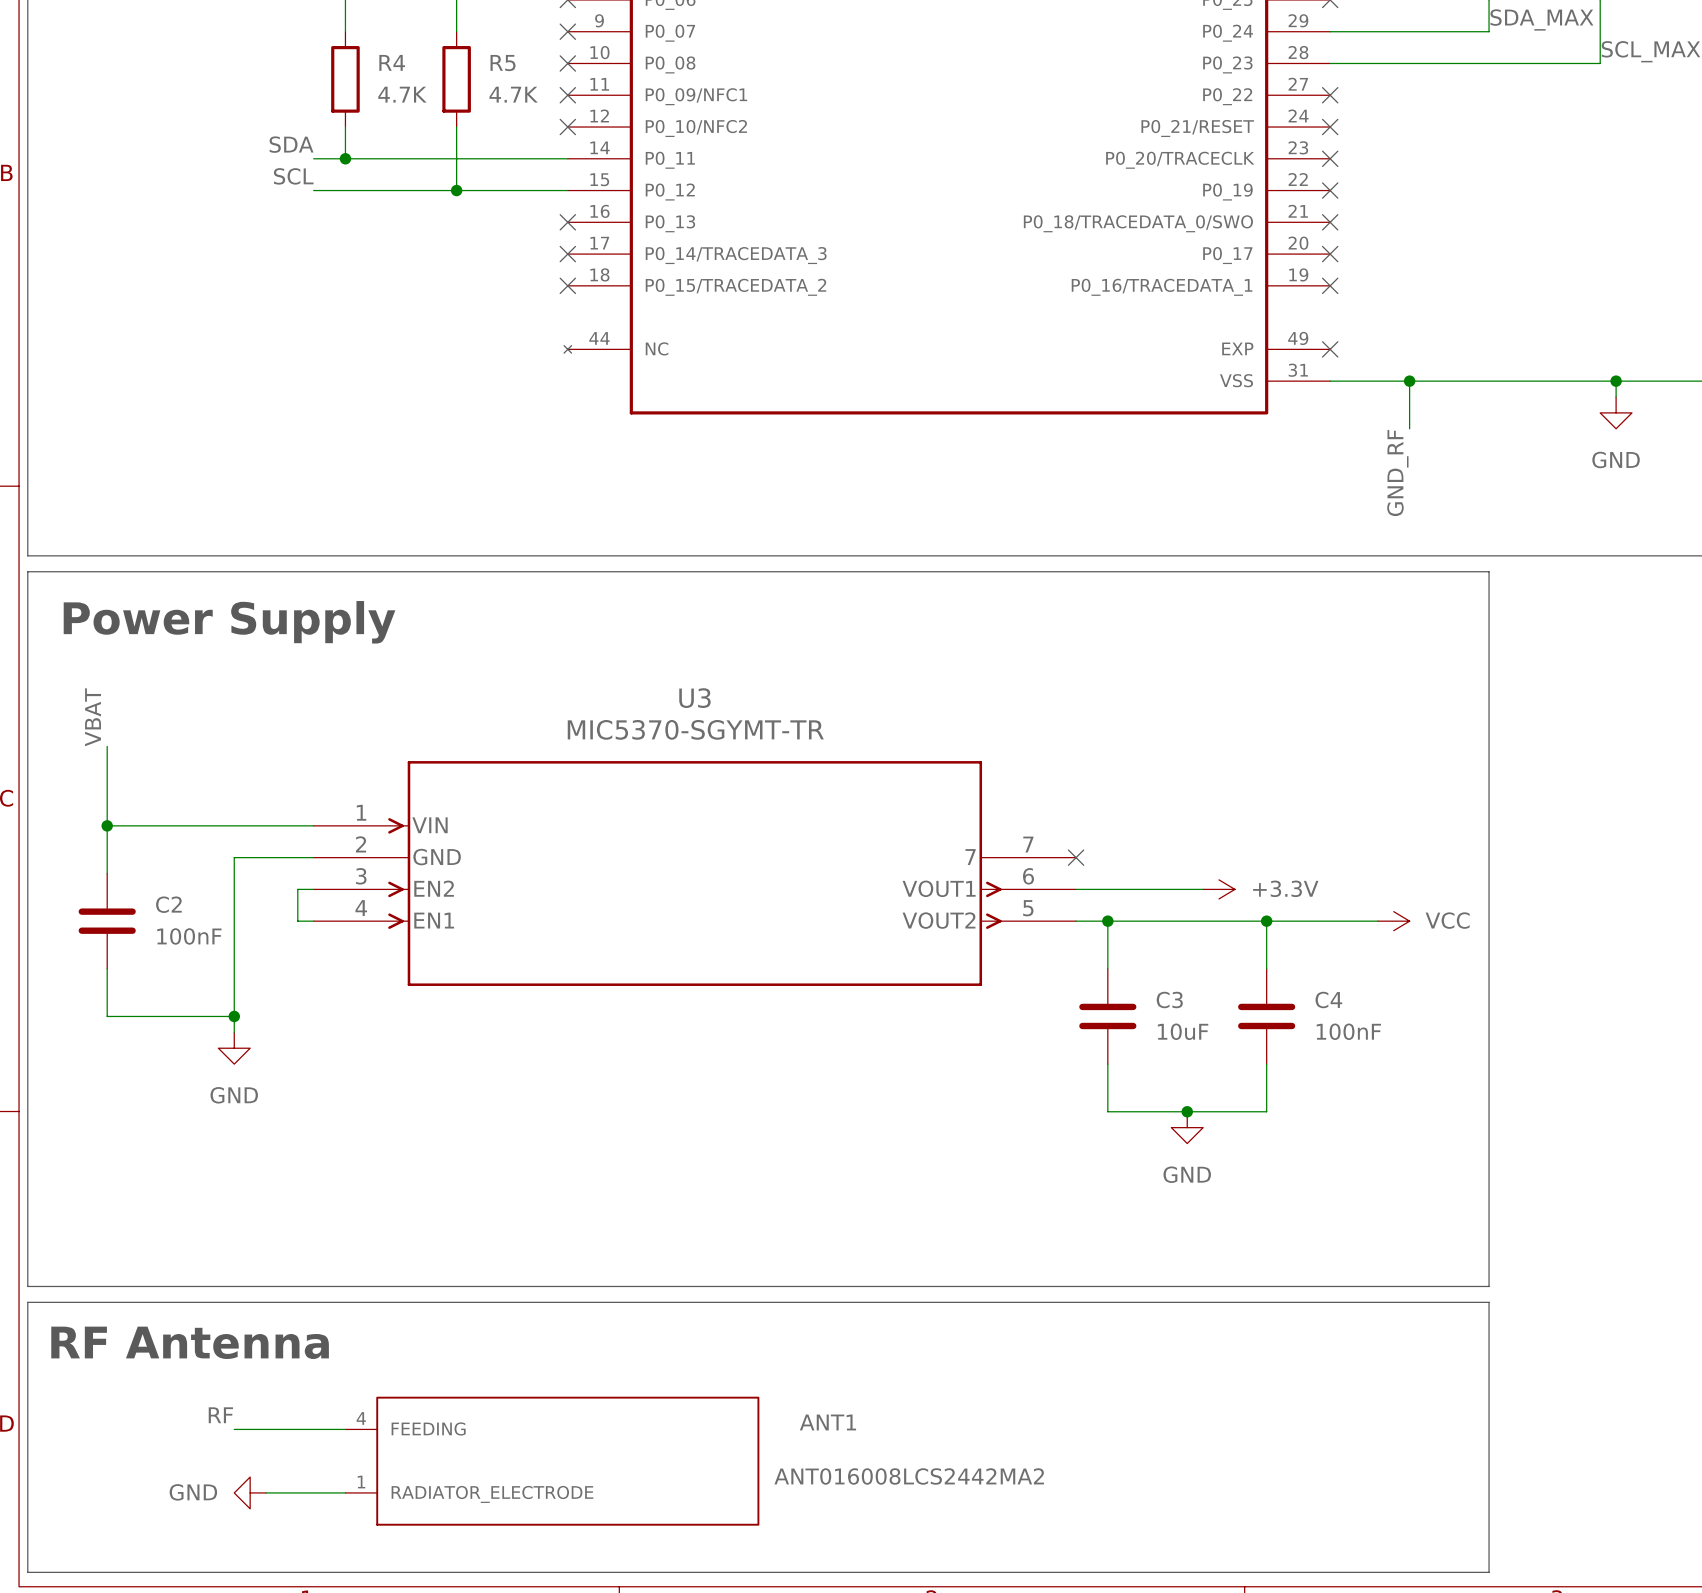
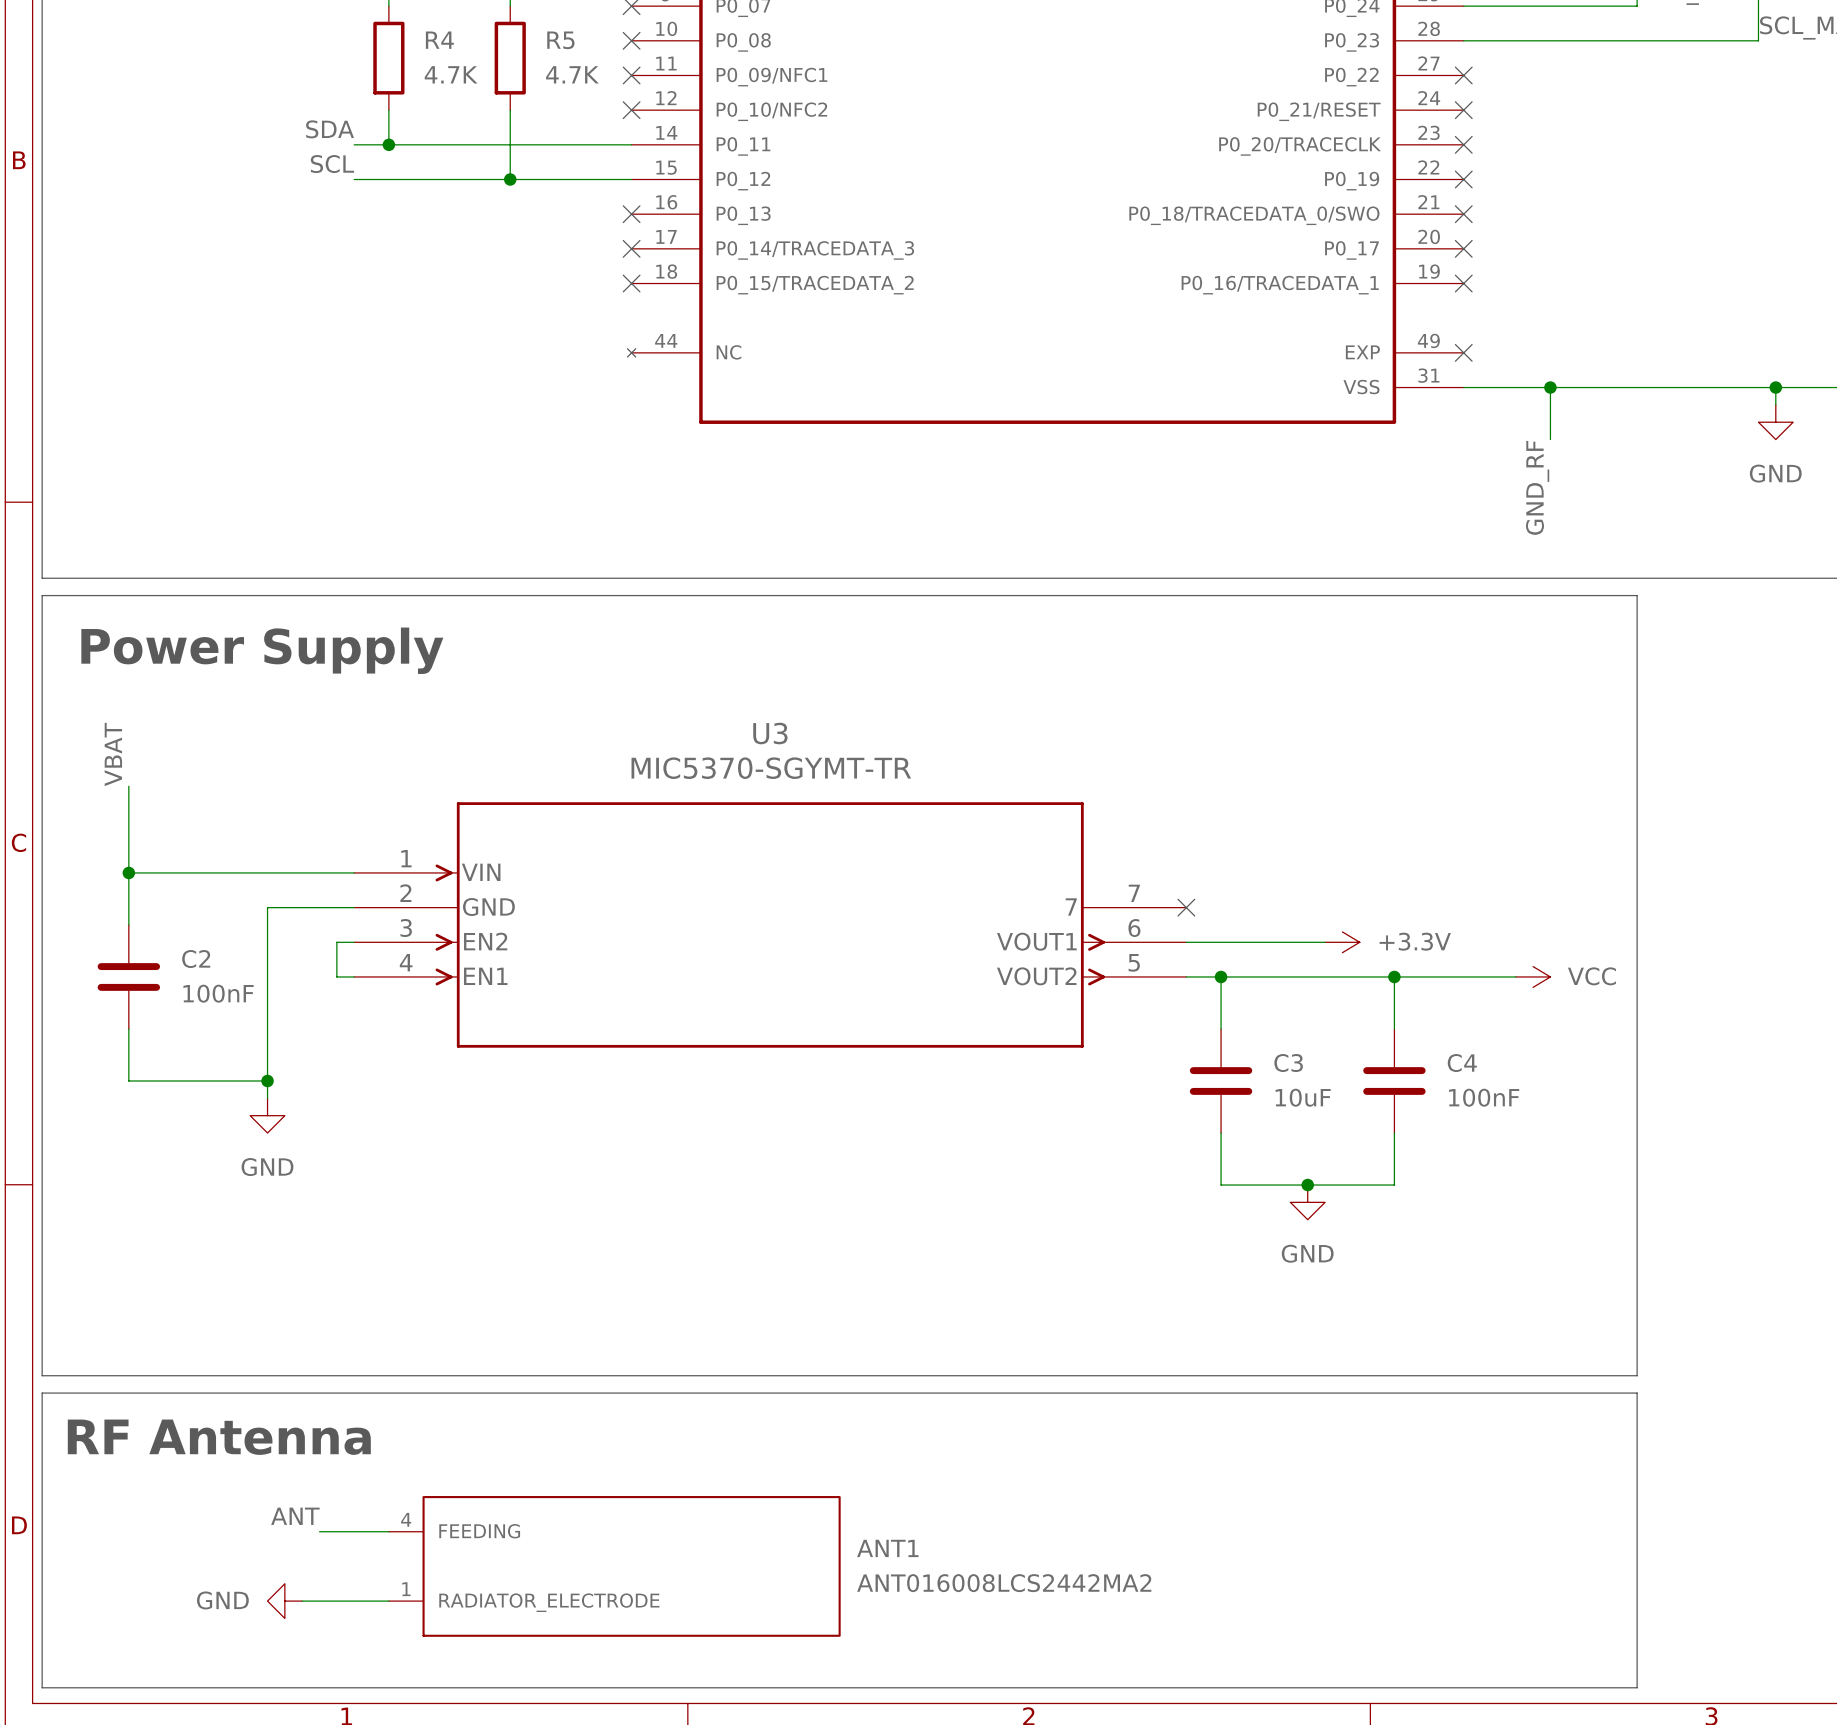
label: RF (220, 1415) -> none
label: none -> ANT (295, 1516)
ANT1 name position: ANT1 (827, 1422) -> ANT1 (887, 1548)
wire: (234, 1429) (281, 1429) -> none

